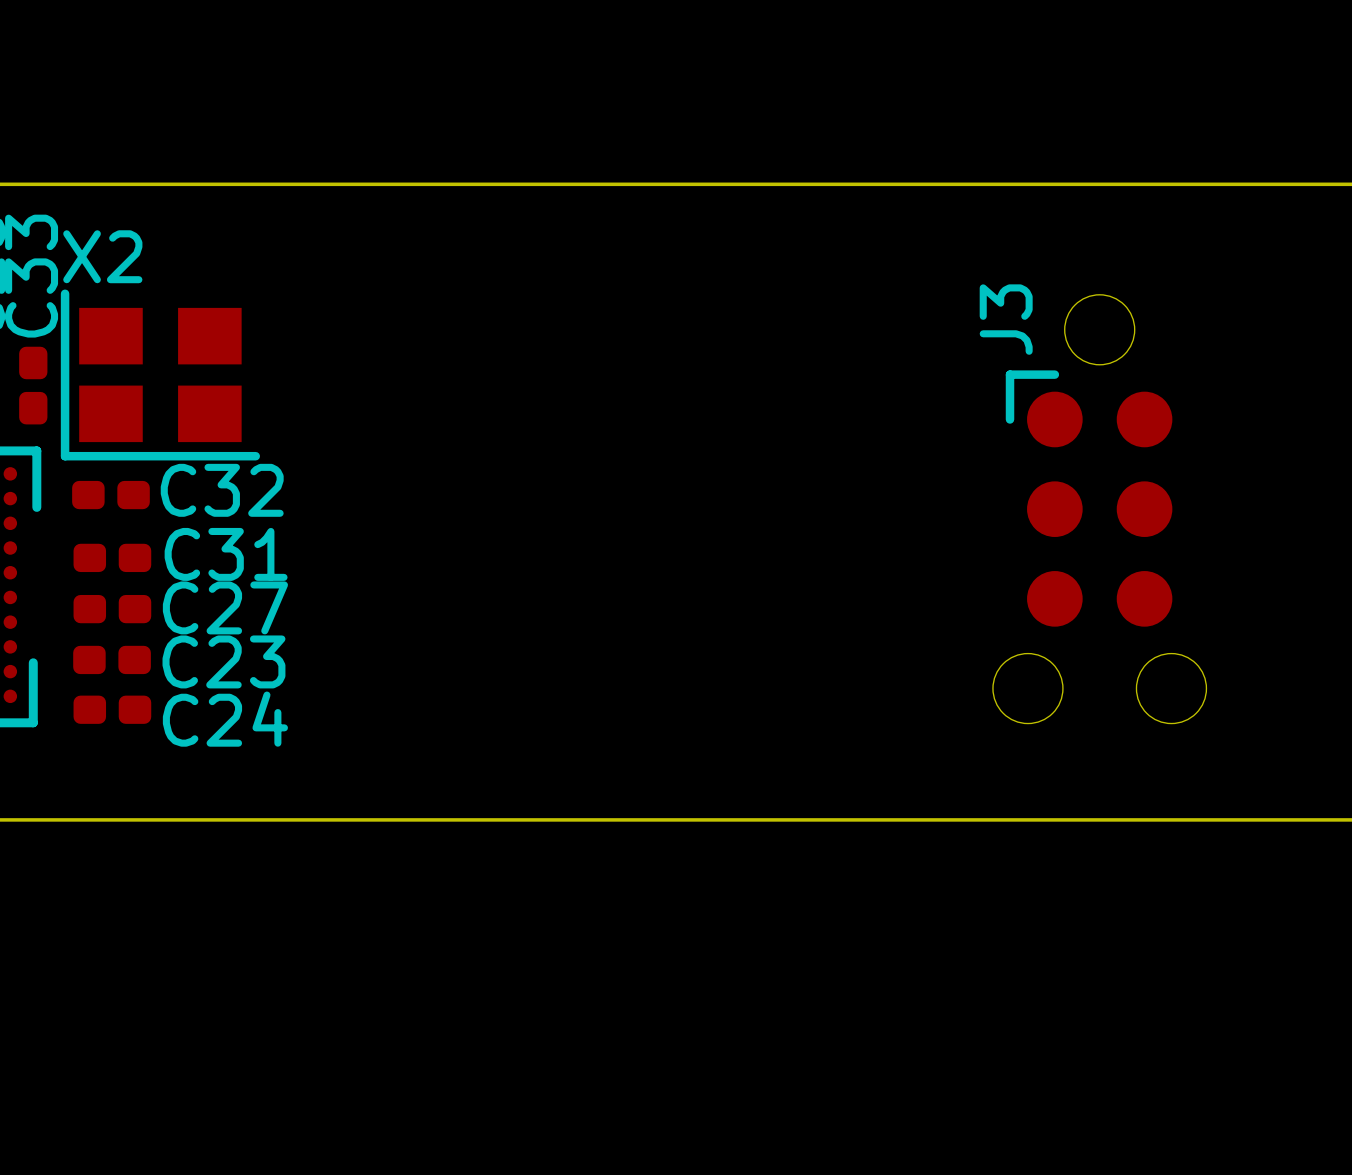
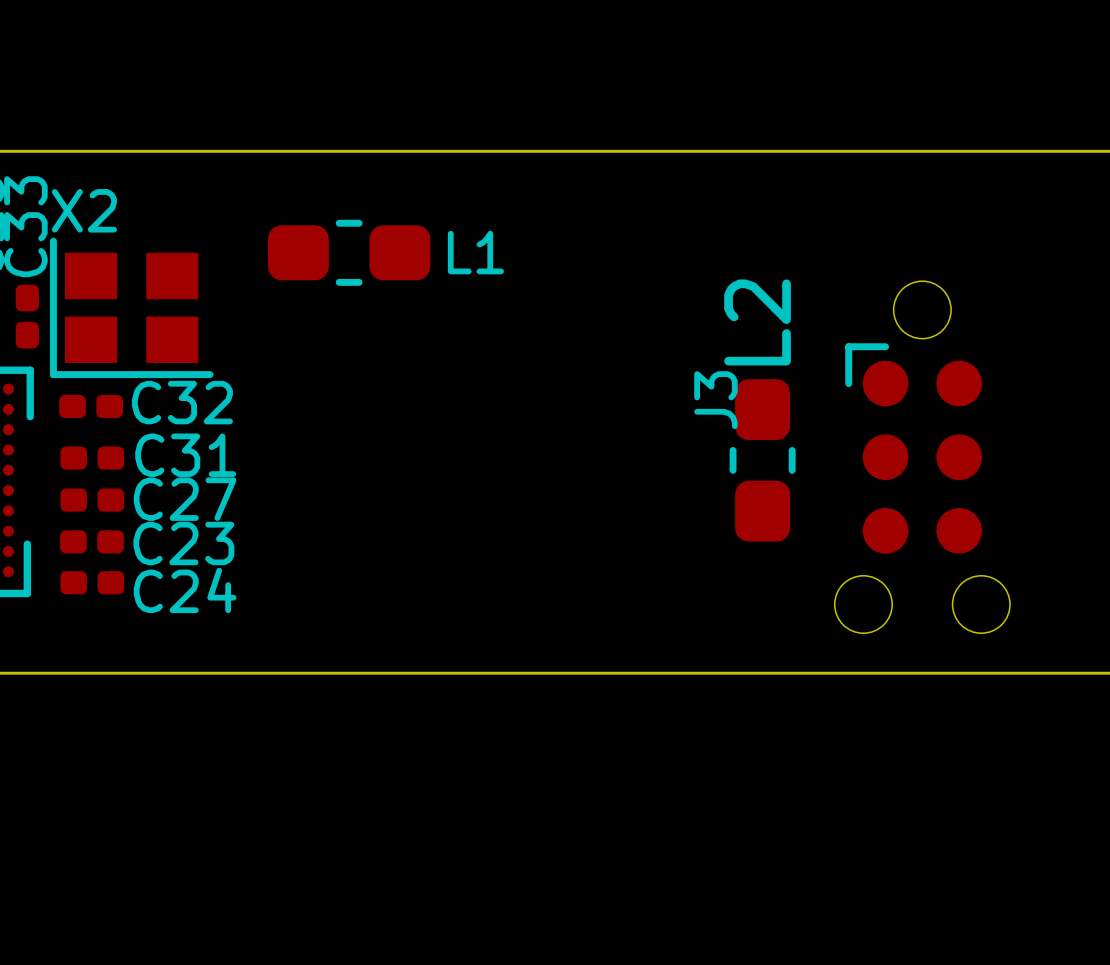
L1: none -> (349, 252)
J3 name position: J3 (1006, 319) -> J3 (715, 400)
J3 position: (1099, 509) -> (922, 457)
L2: none -> (762, 460)

